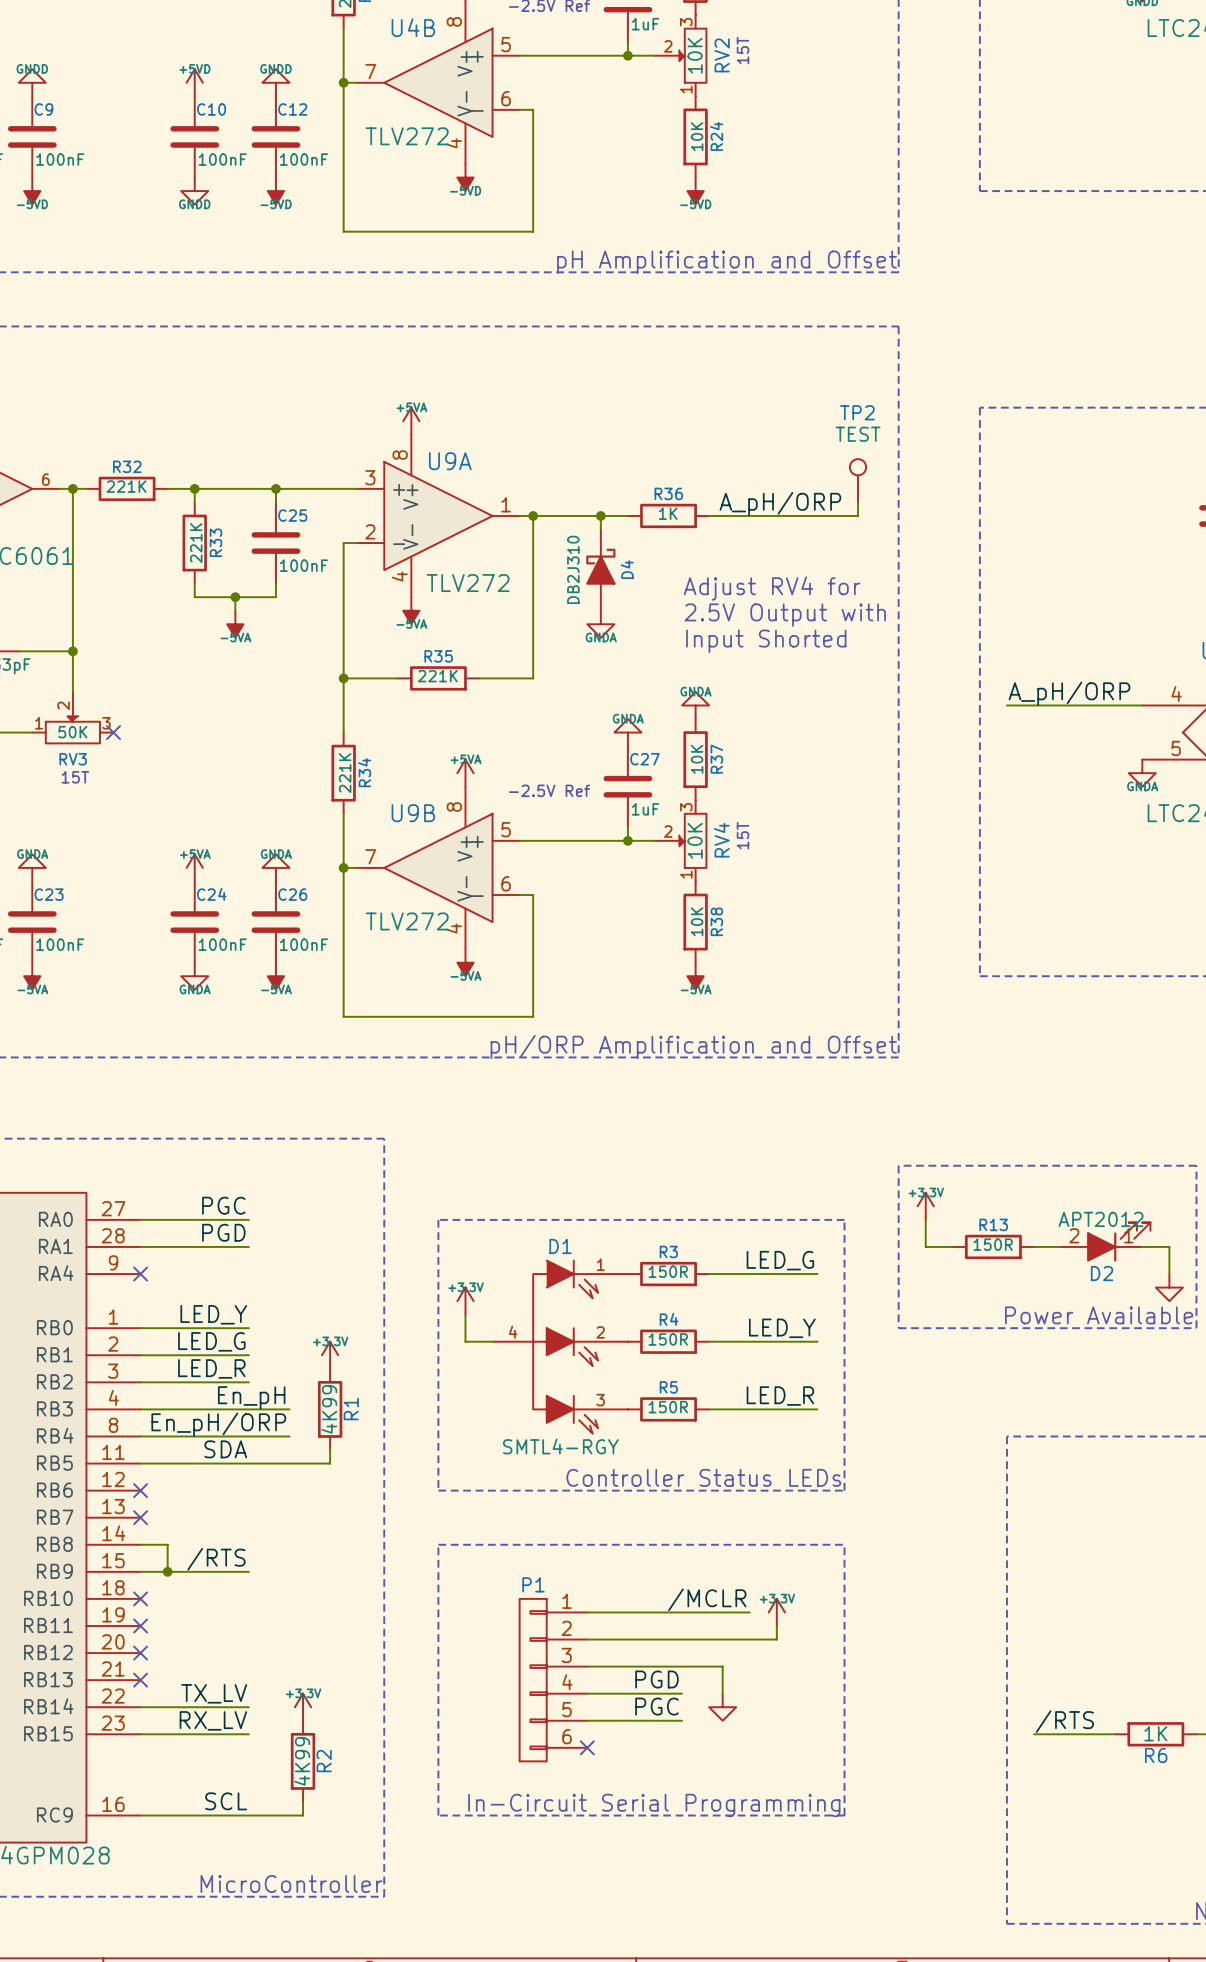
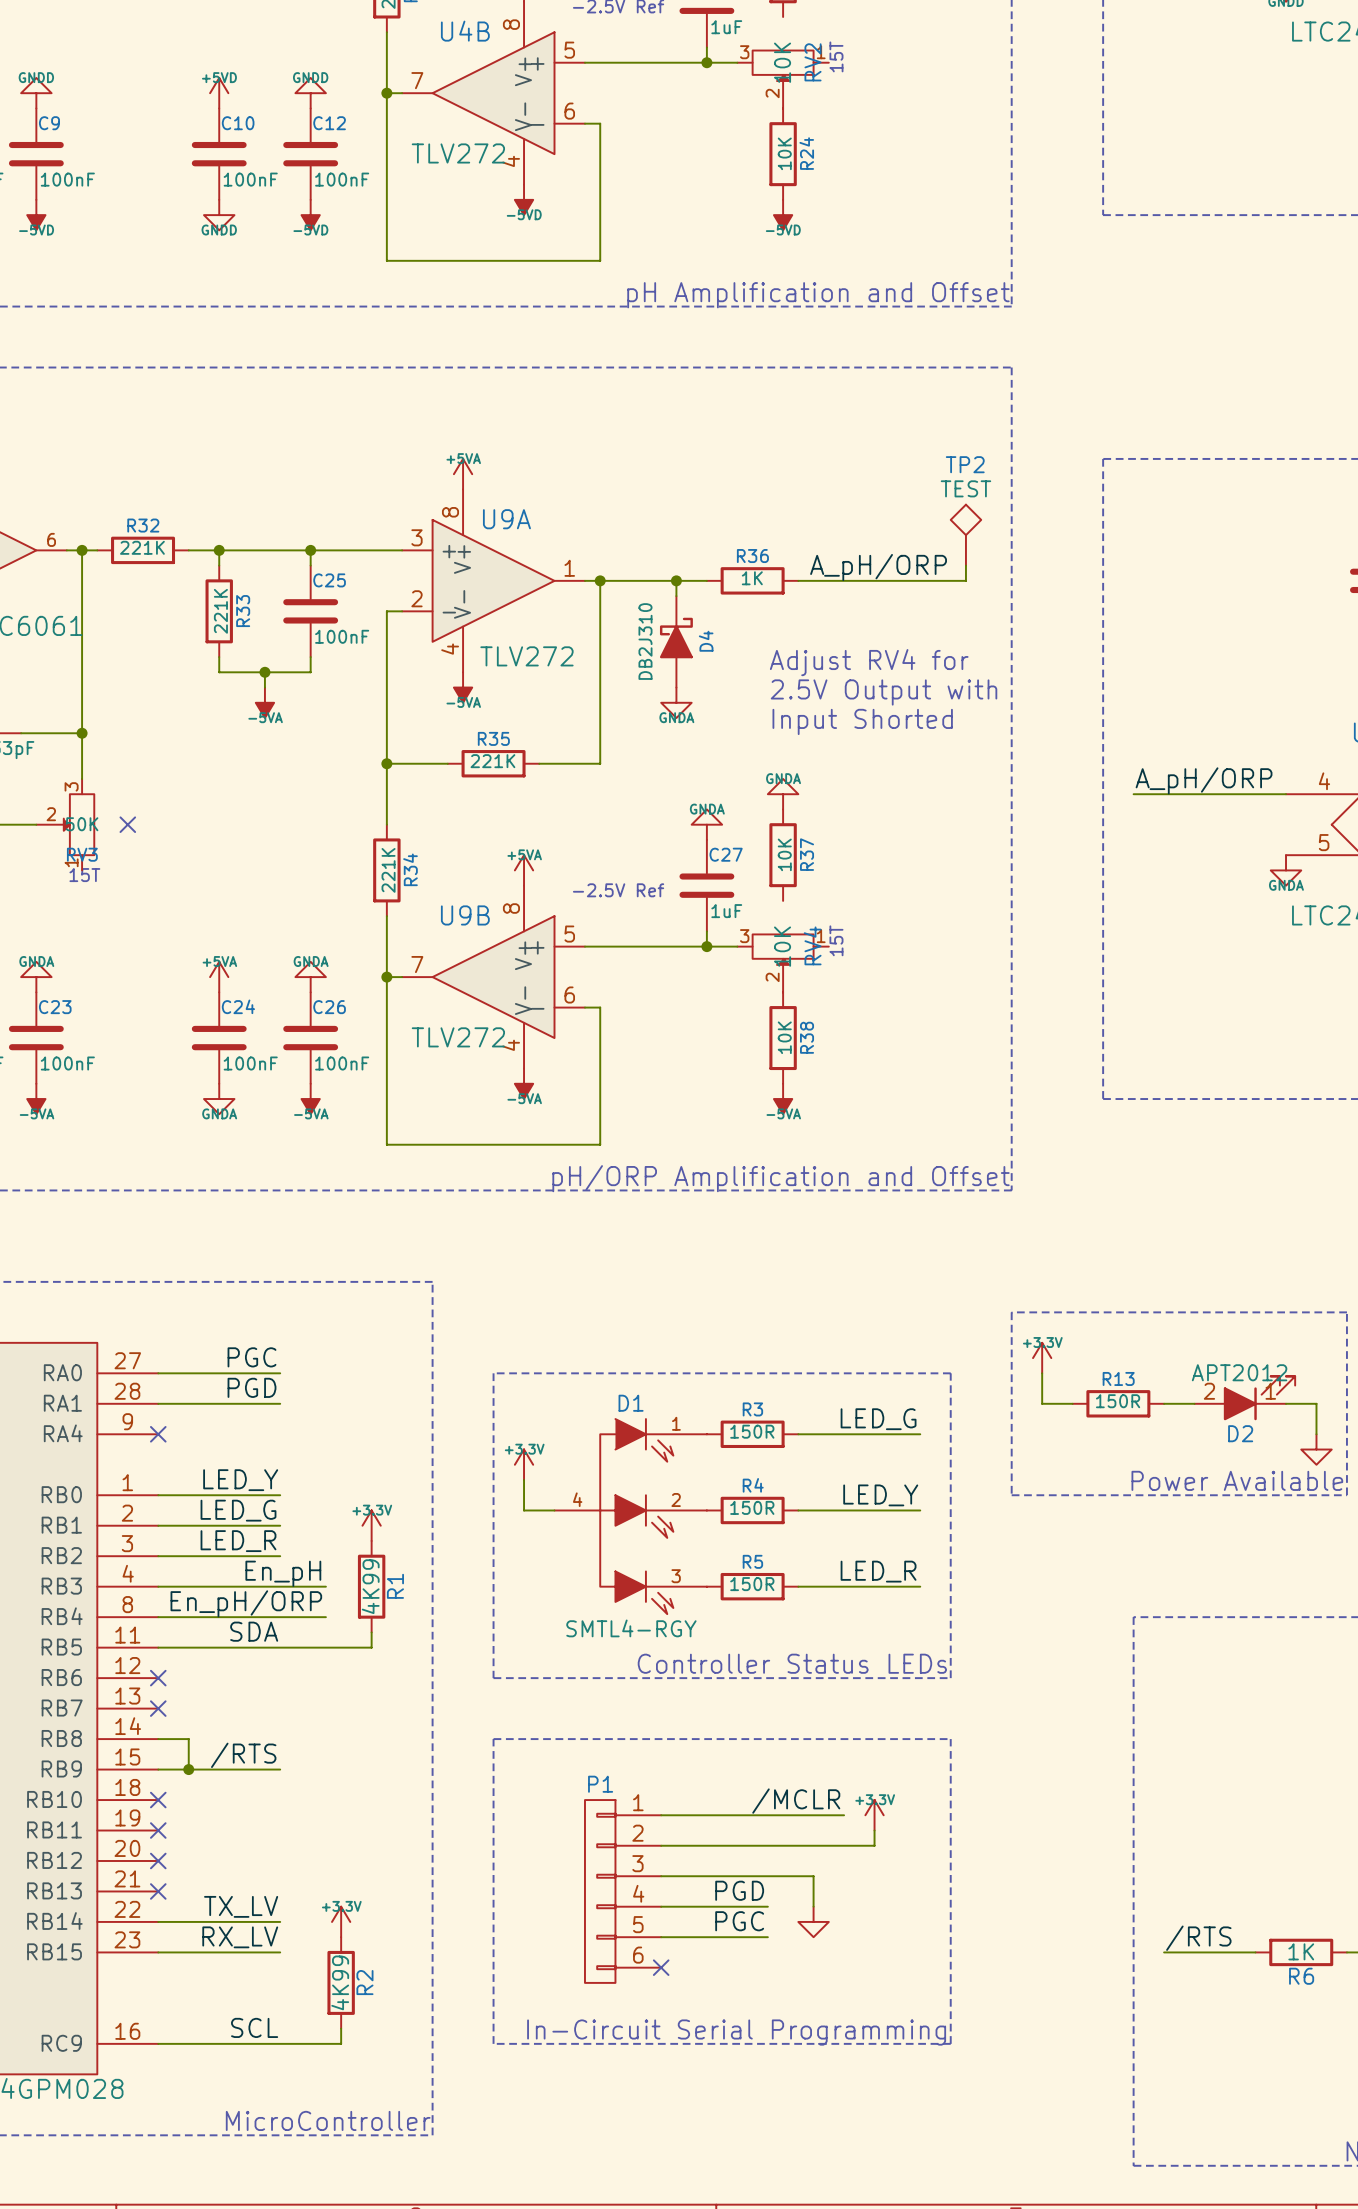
RV2 rotation: 0° (692, 55) -> 90° counterclockwise (783, 65)
TP2 symbol: [849, 459, 867, 503] -> [950, 504, 982, 566]
RV3 rotation: 0° (72, 729) -> 90° counterclockwise (79, 824)
RV4 rotation: 0° (692, 840) -> 90° counterclockwise (783, 949)

